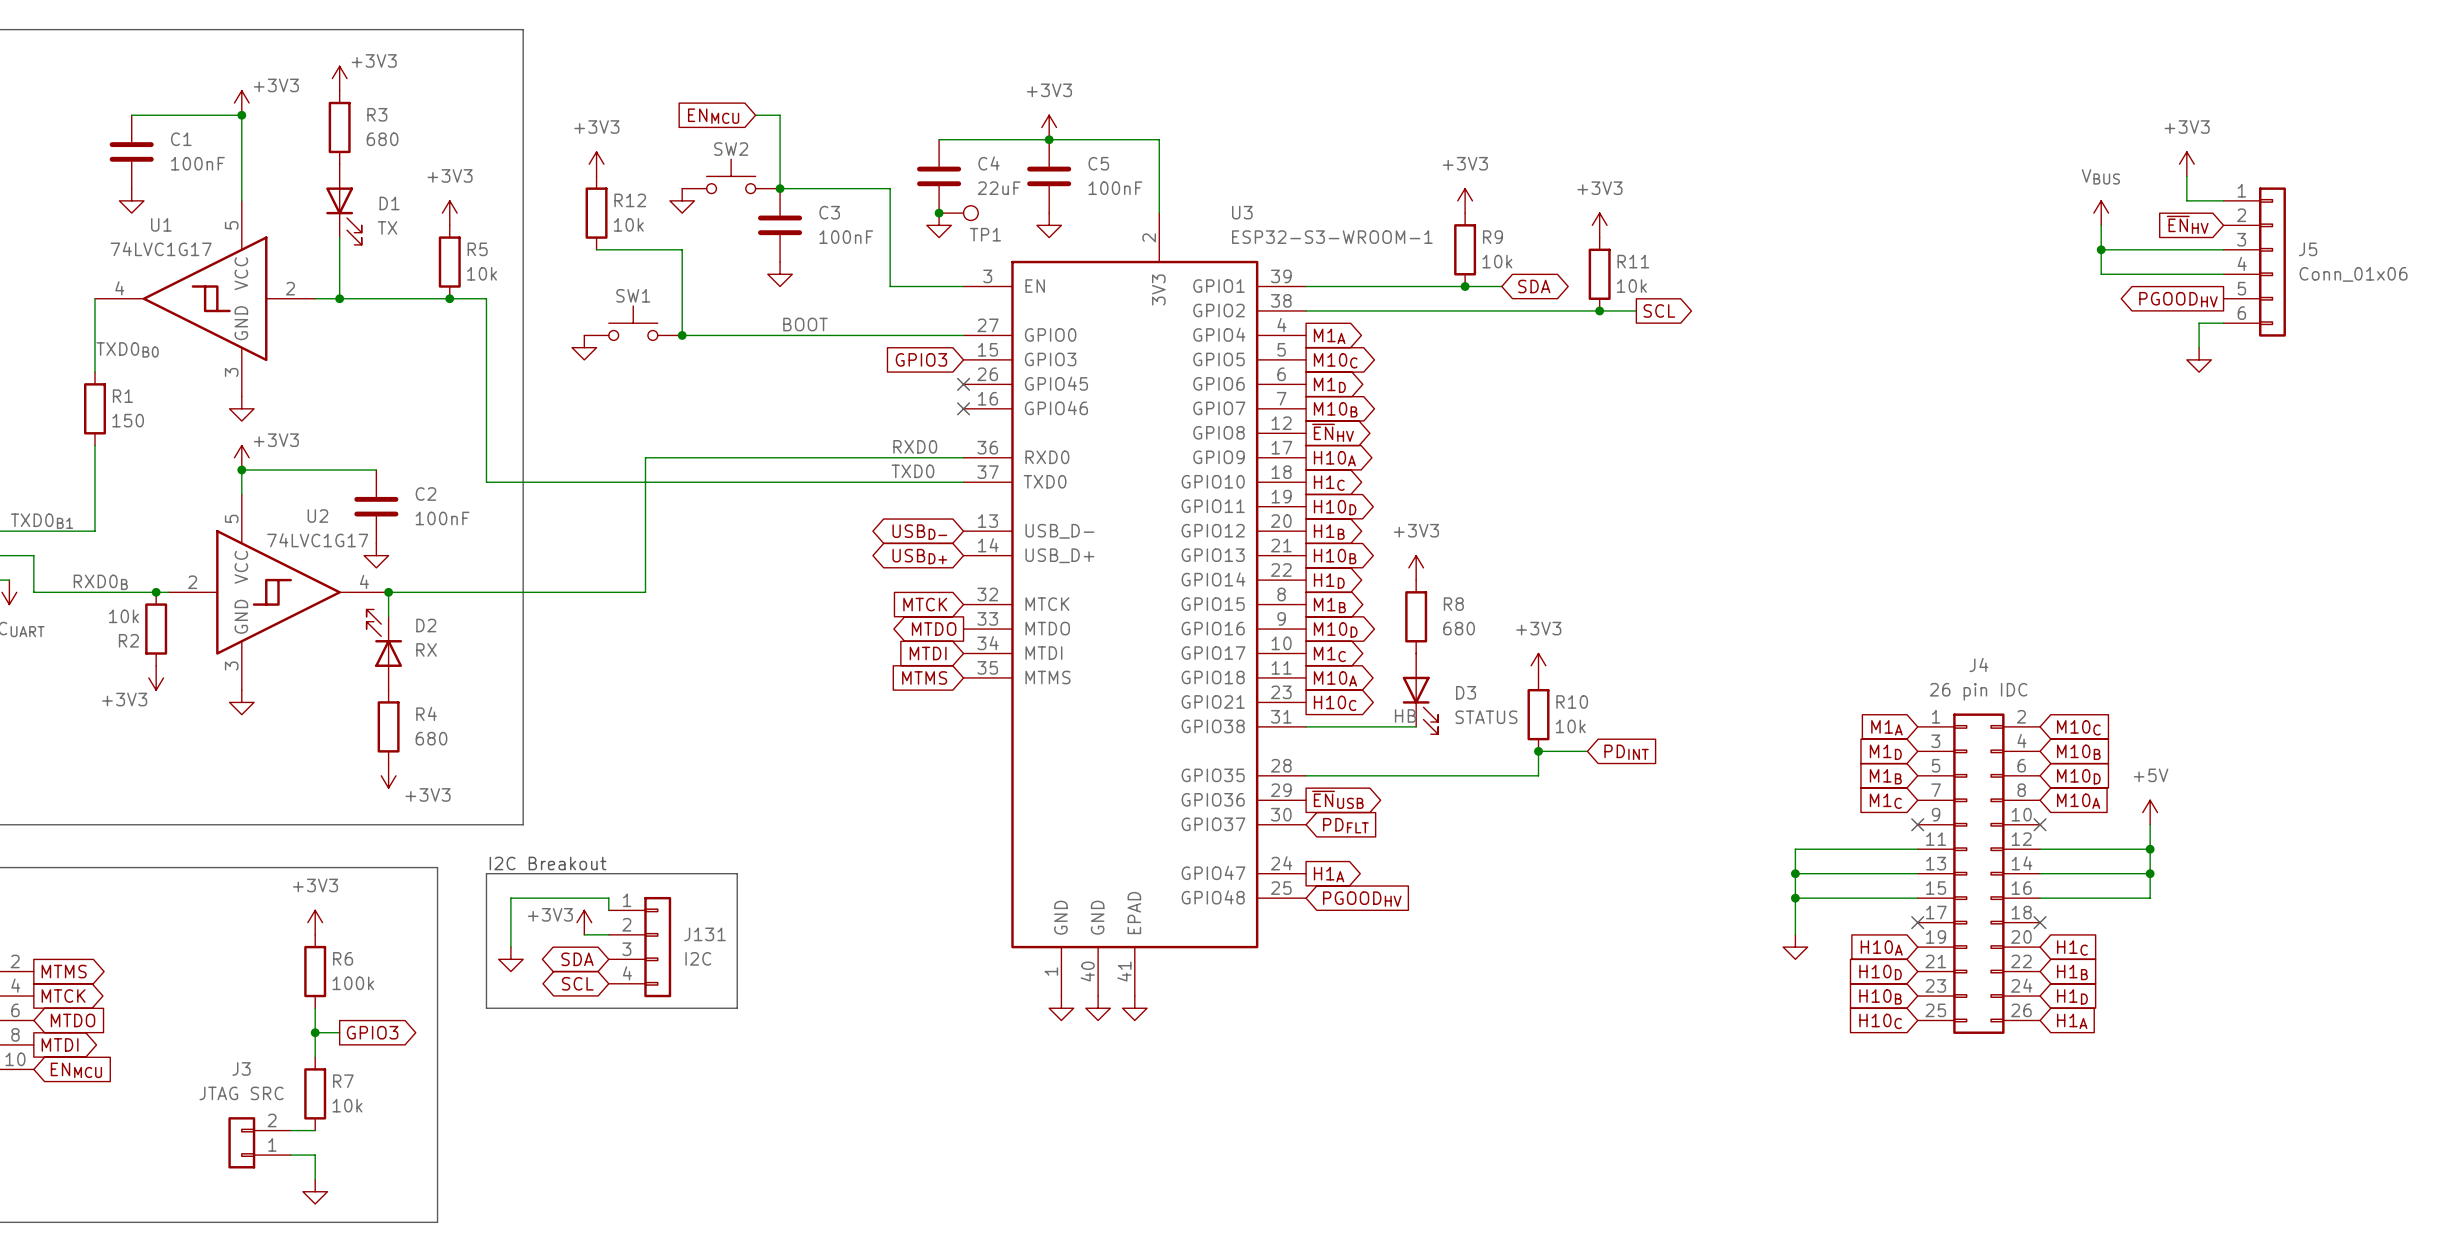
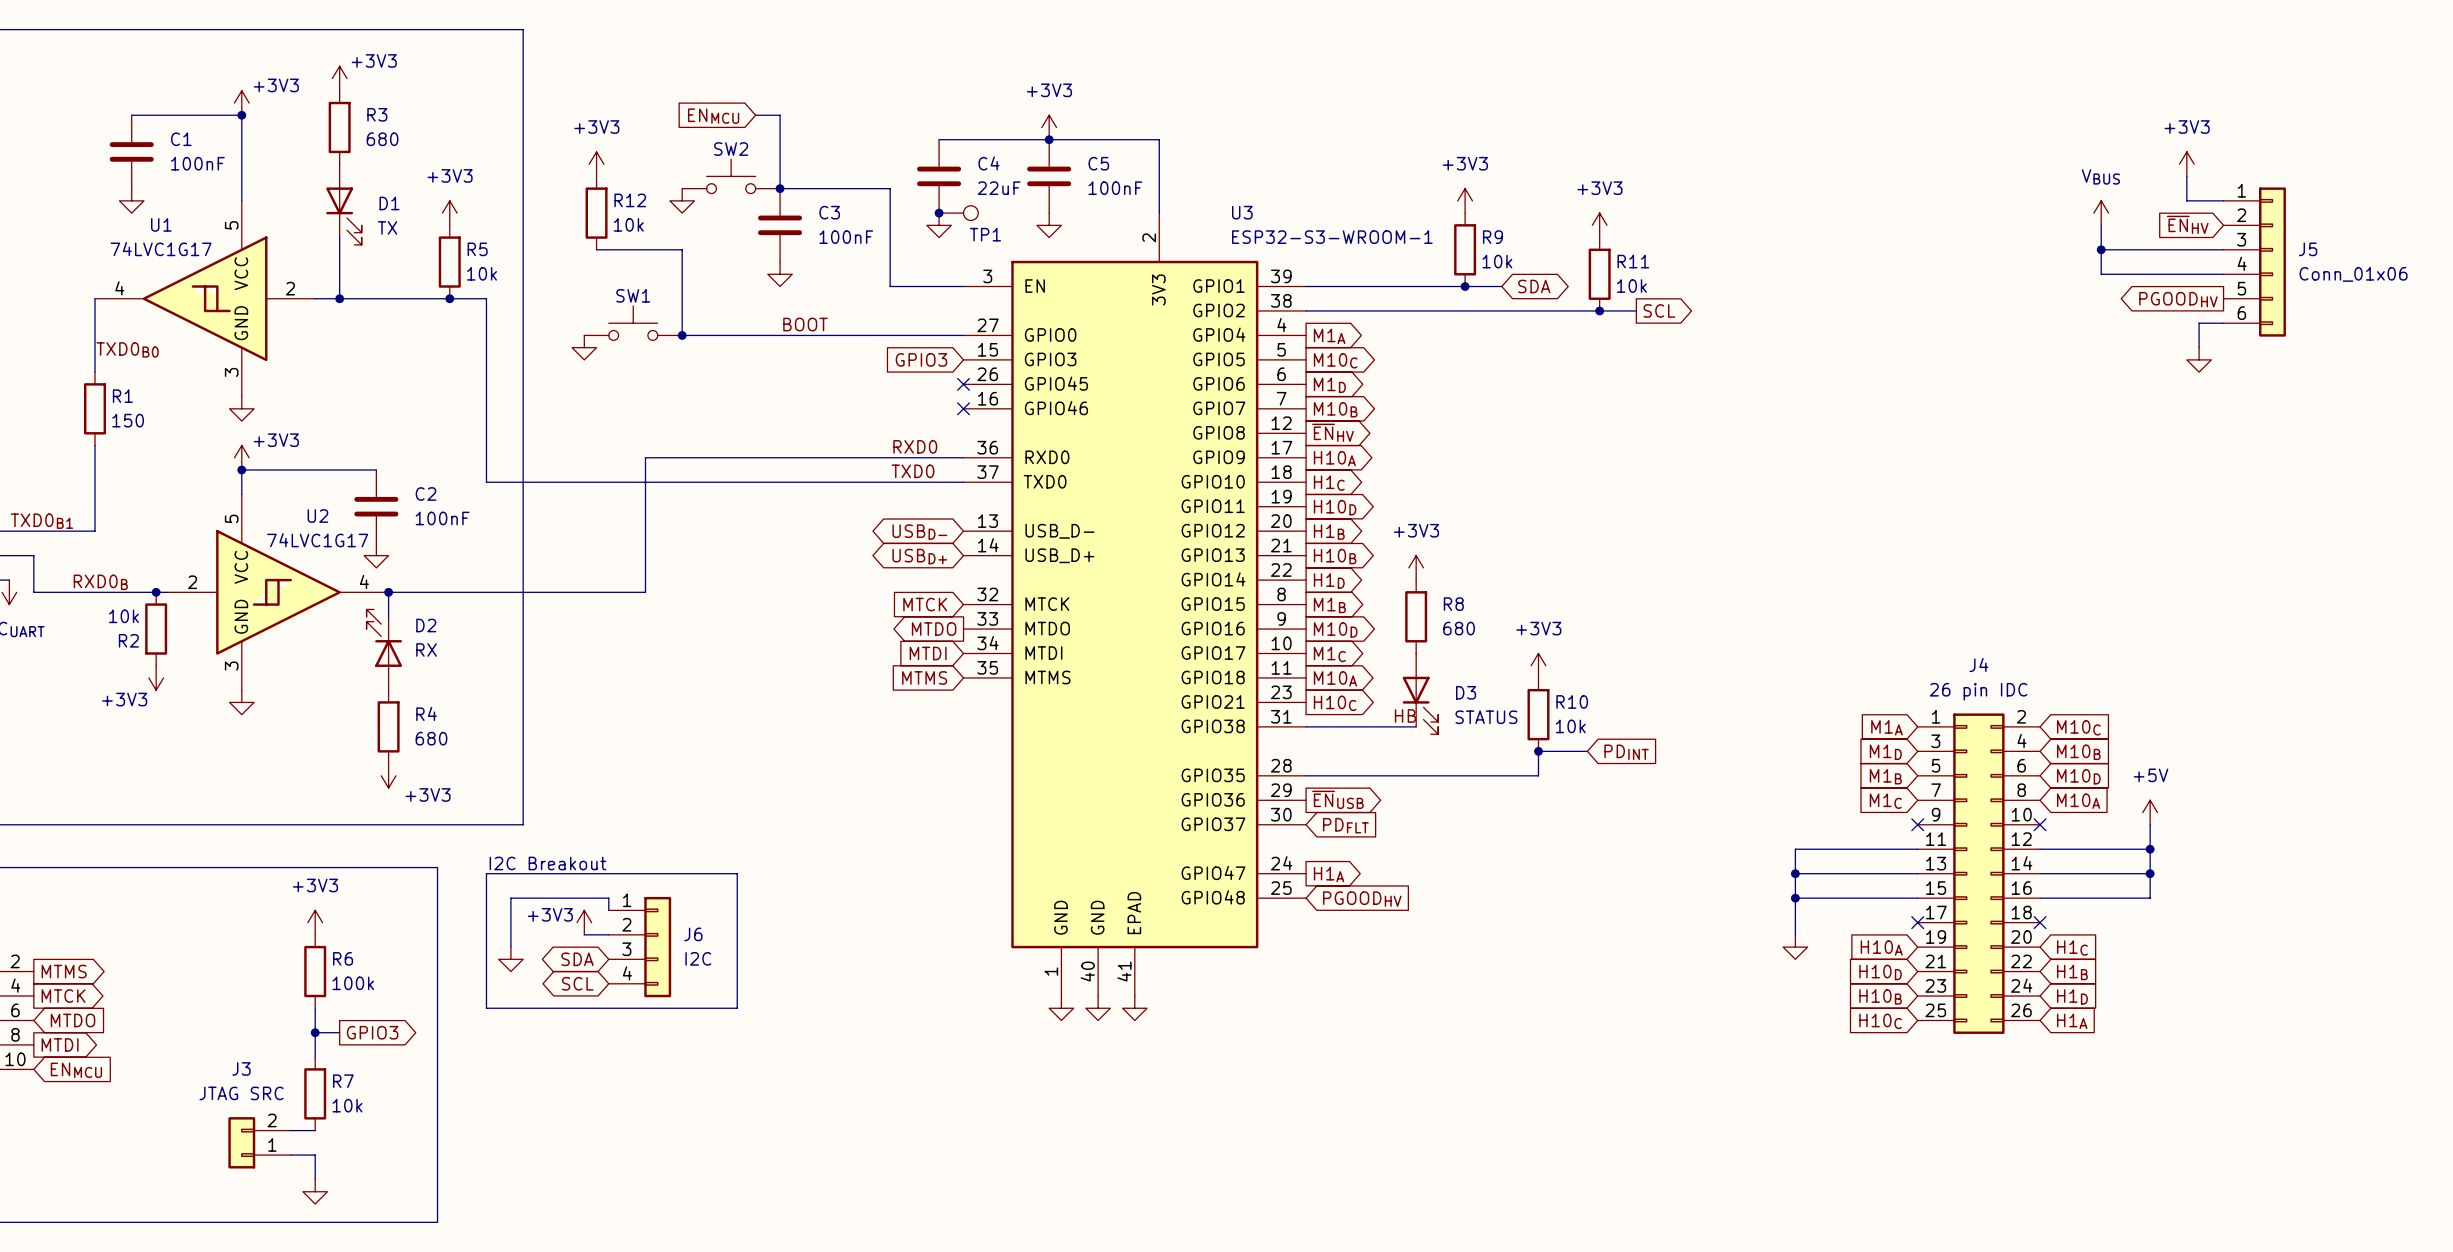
J131 name: J131 (705, 934) -> J6 (693, 934)

